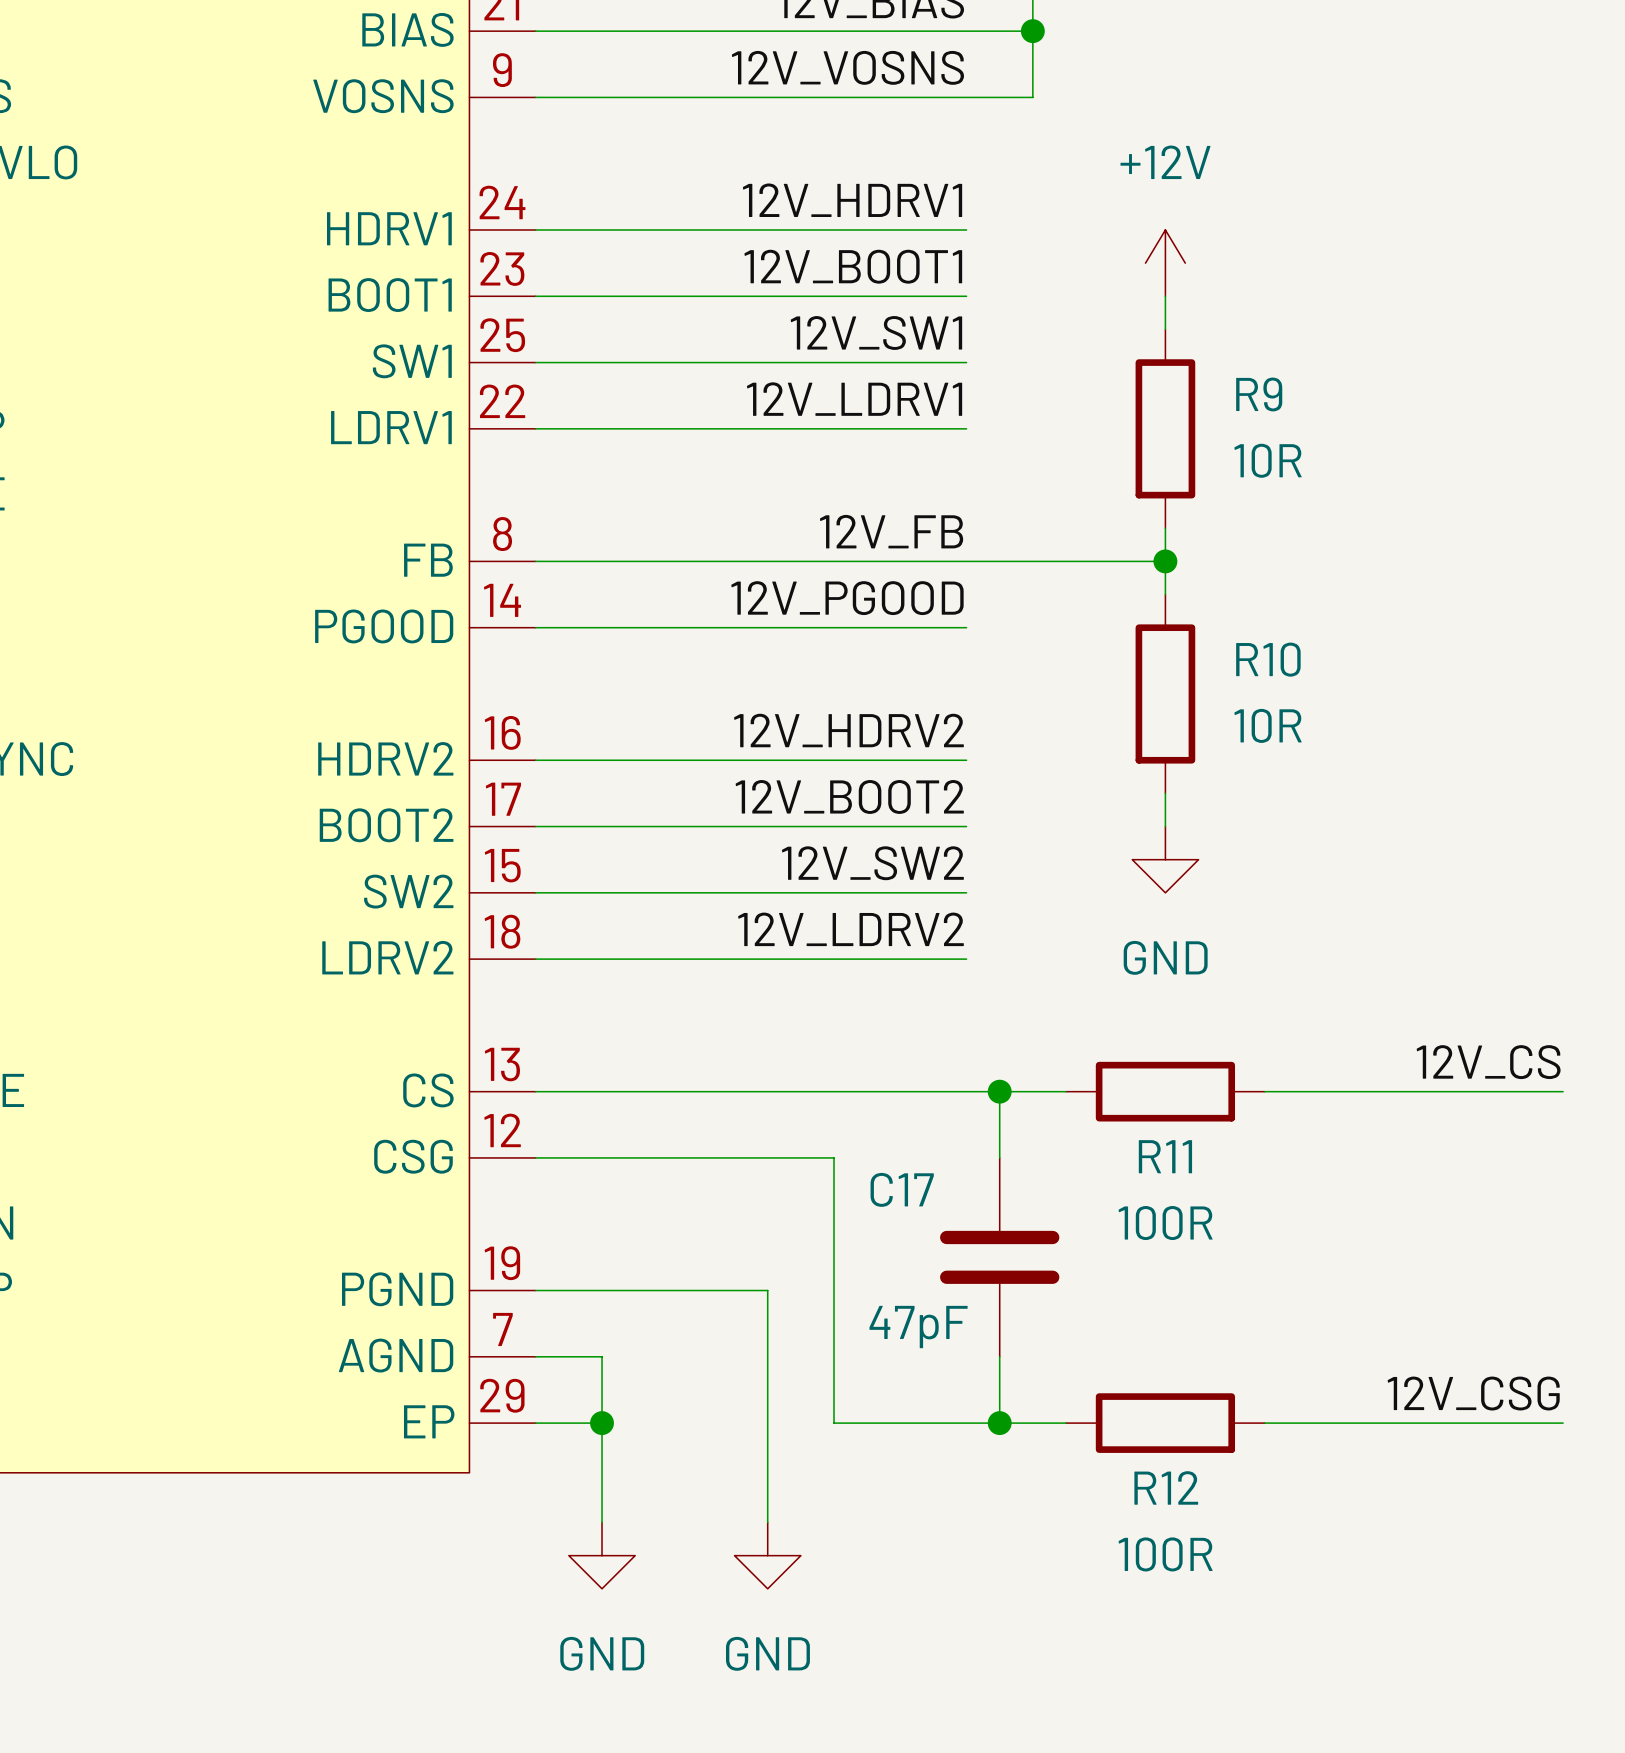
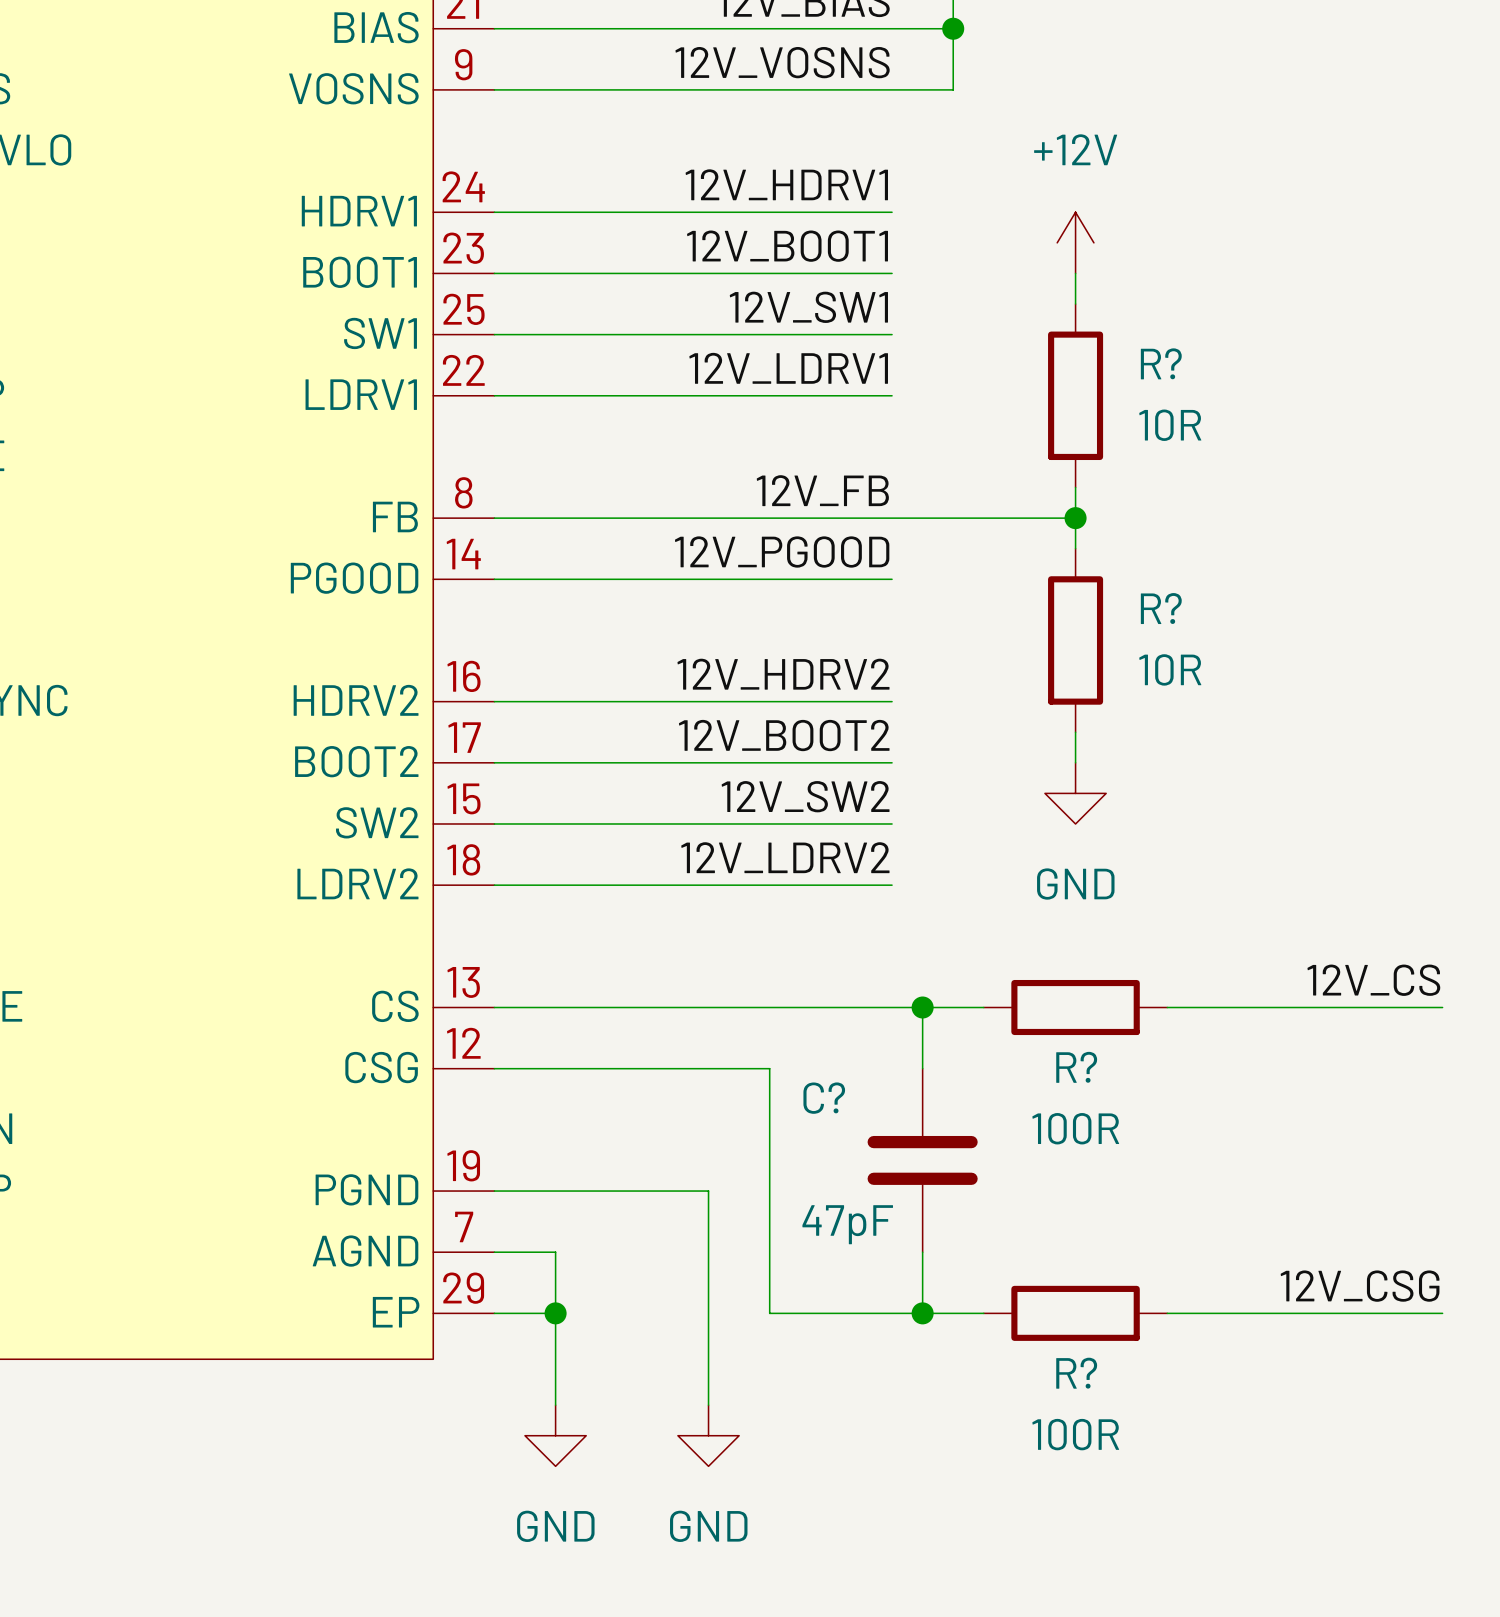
R9 name: R9 (1259, 394) -> R? (1161, 363)
R10 name: R10 (1268, 659) -> R? (1161, 608)
R11 name: R11 (1165, 1156) -> R? (1076, 1067)
C17 name: C17 (902, 1189) -> C? (824, 1098)
R12 name: R12 (1166, 1487) -> R? (1076, 1373)

